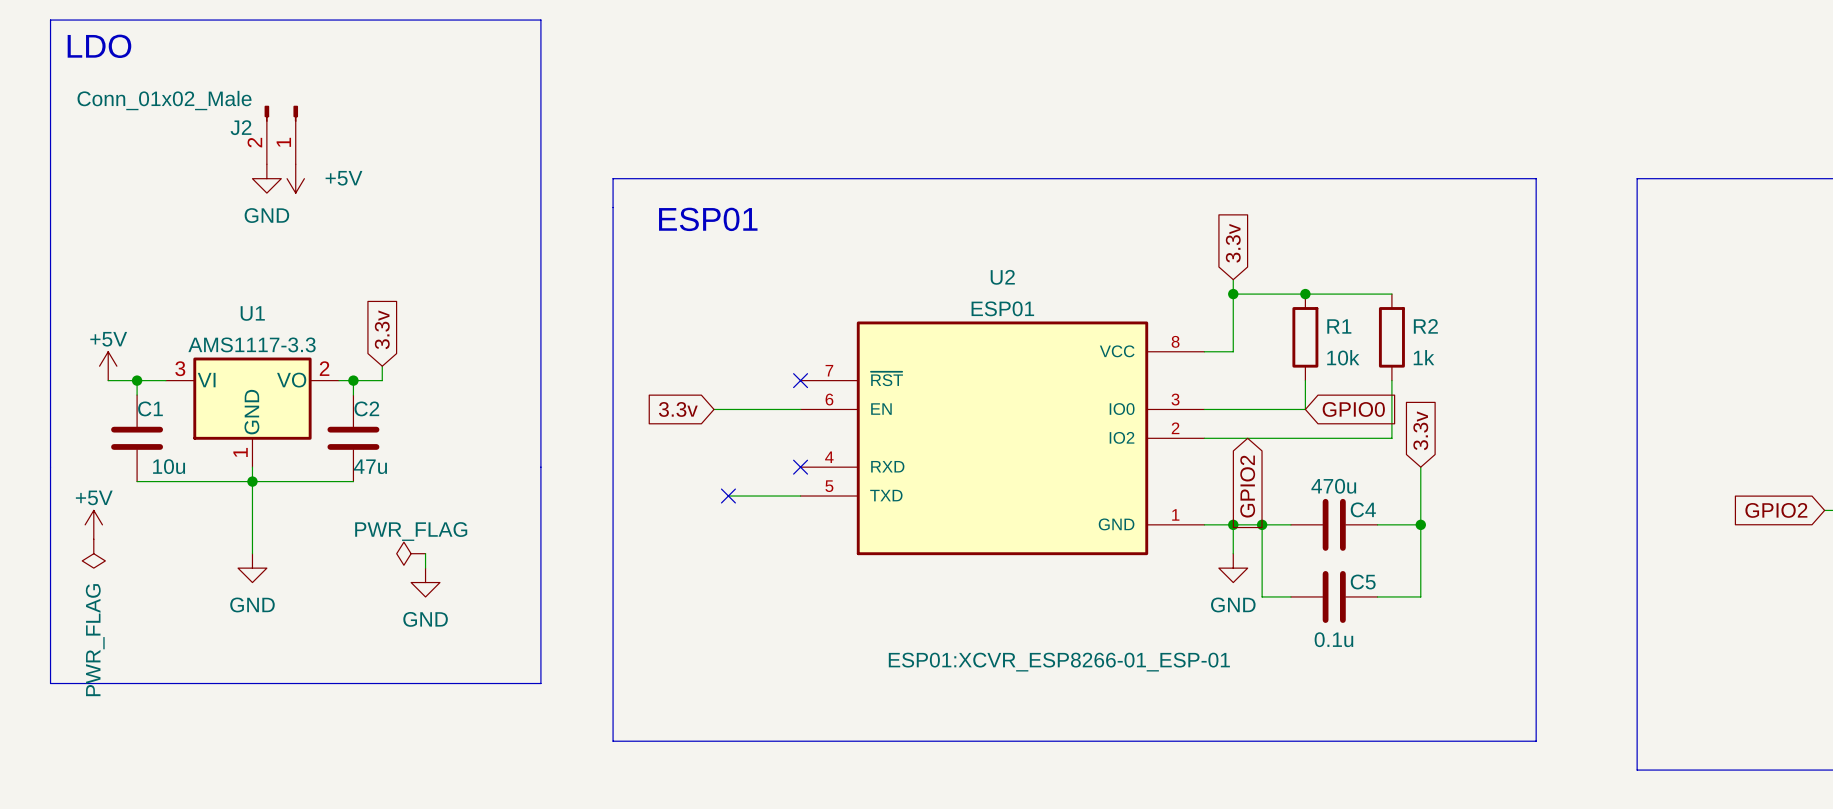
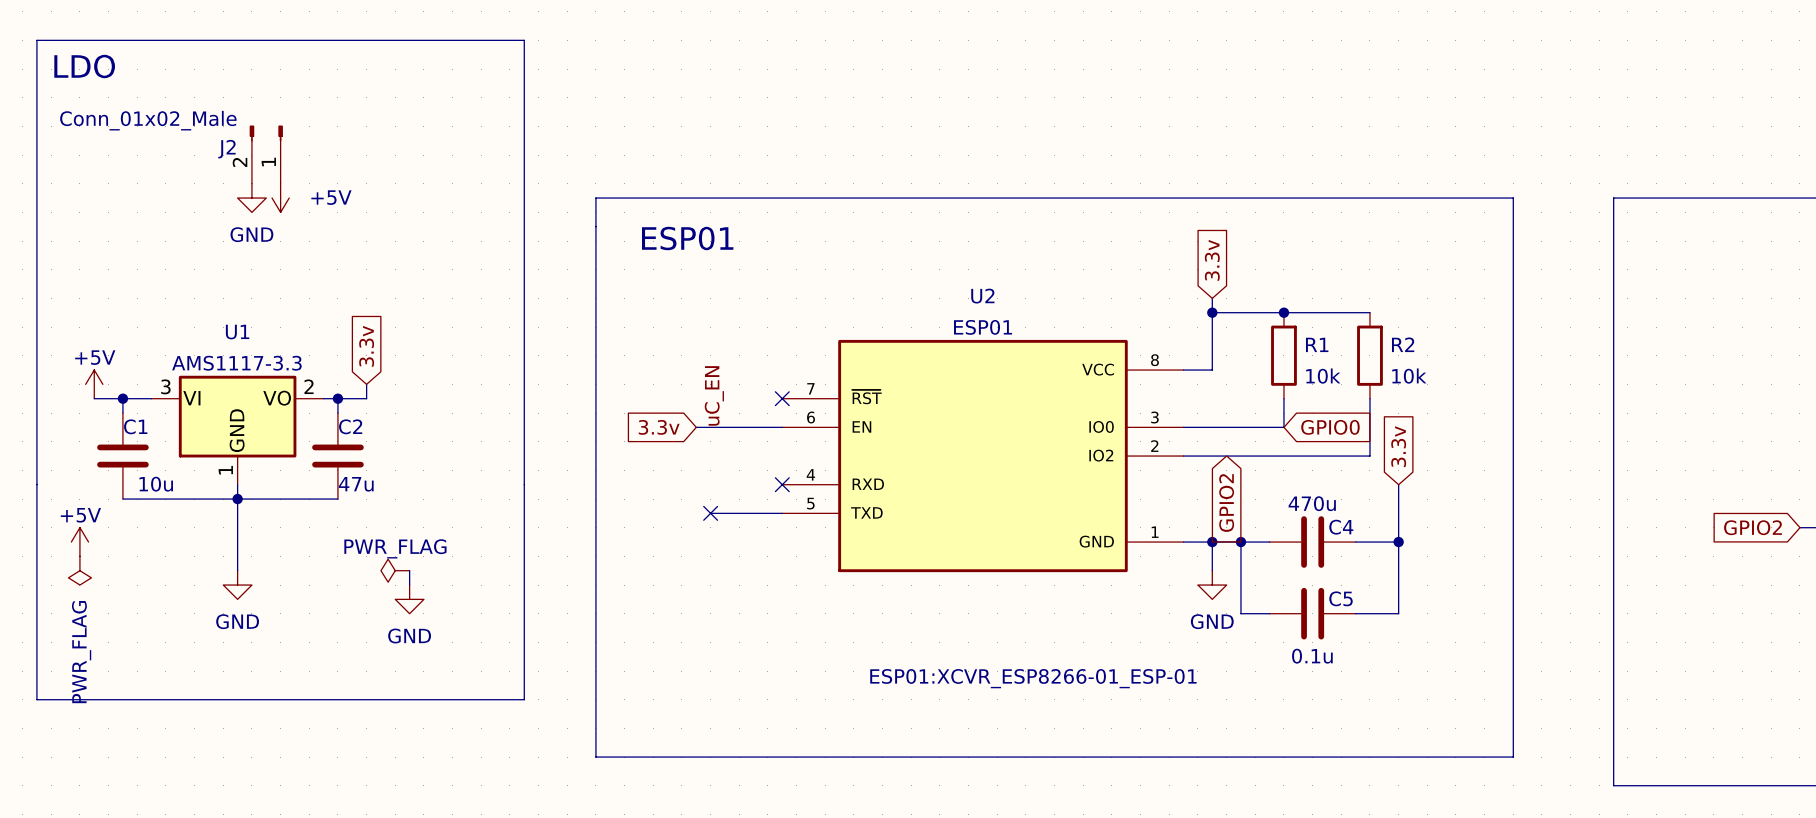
R2 value: 1k (1424, 357) -> 10k (1409, 376)
label: none -> uC_EN (714, 395)

